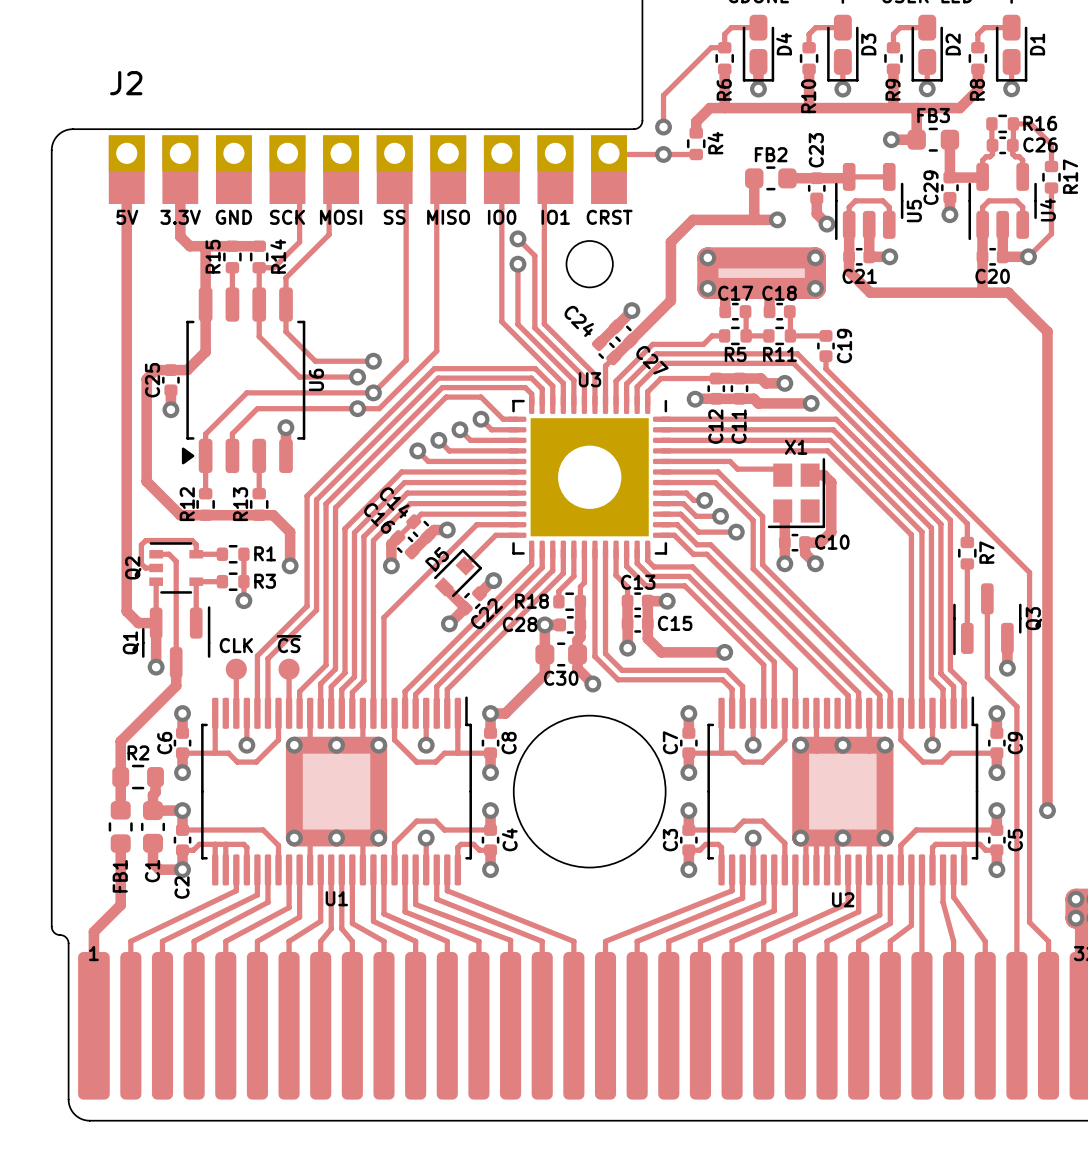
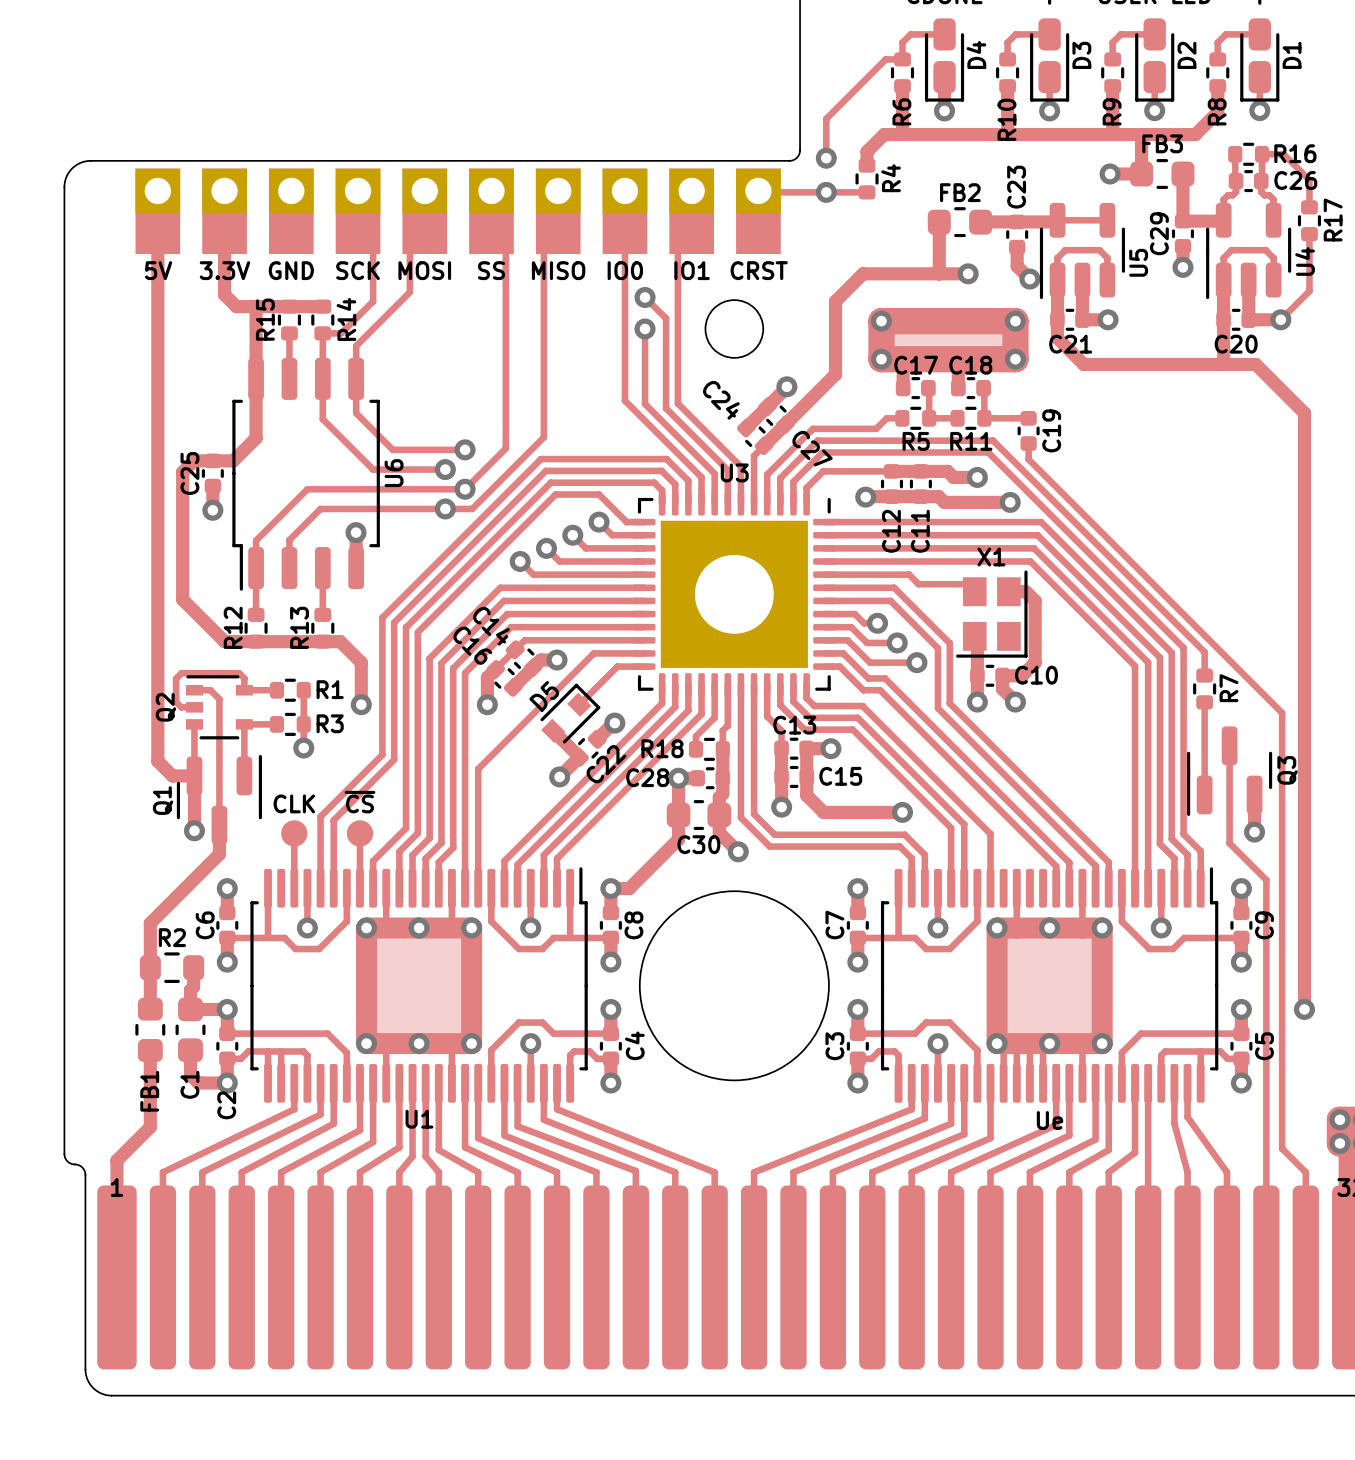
J2 name: J2 (126, 83) -> none
U6 footprint: [181, 287, 306, 474] -> [232, 357, 380, 591]
U2 name: U2 (843, 899) -> Ue (1050, 1120)

